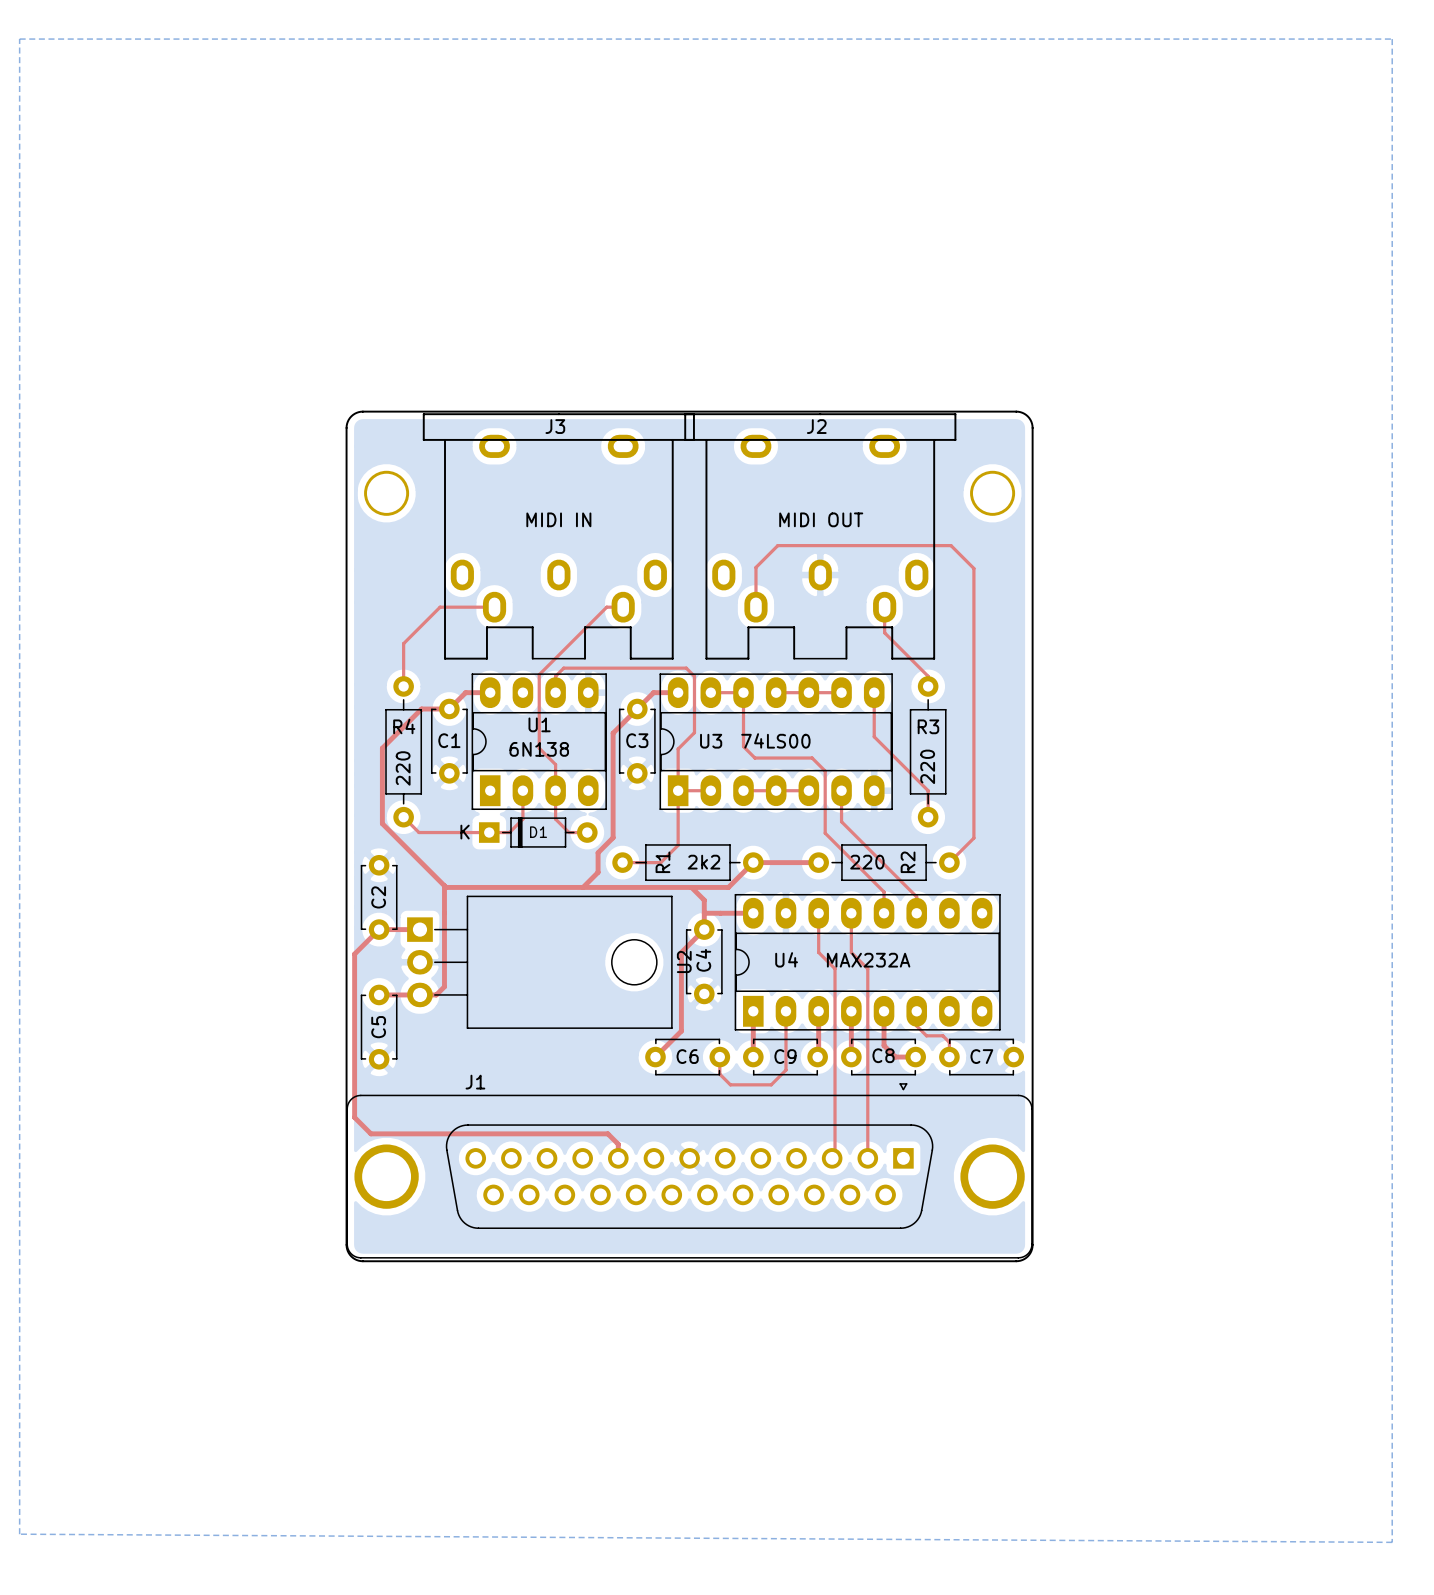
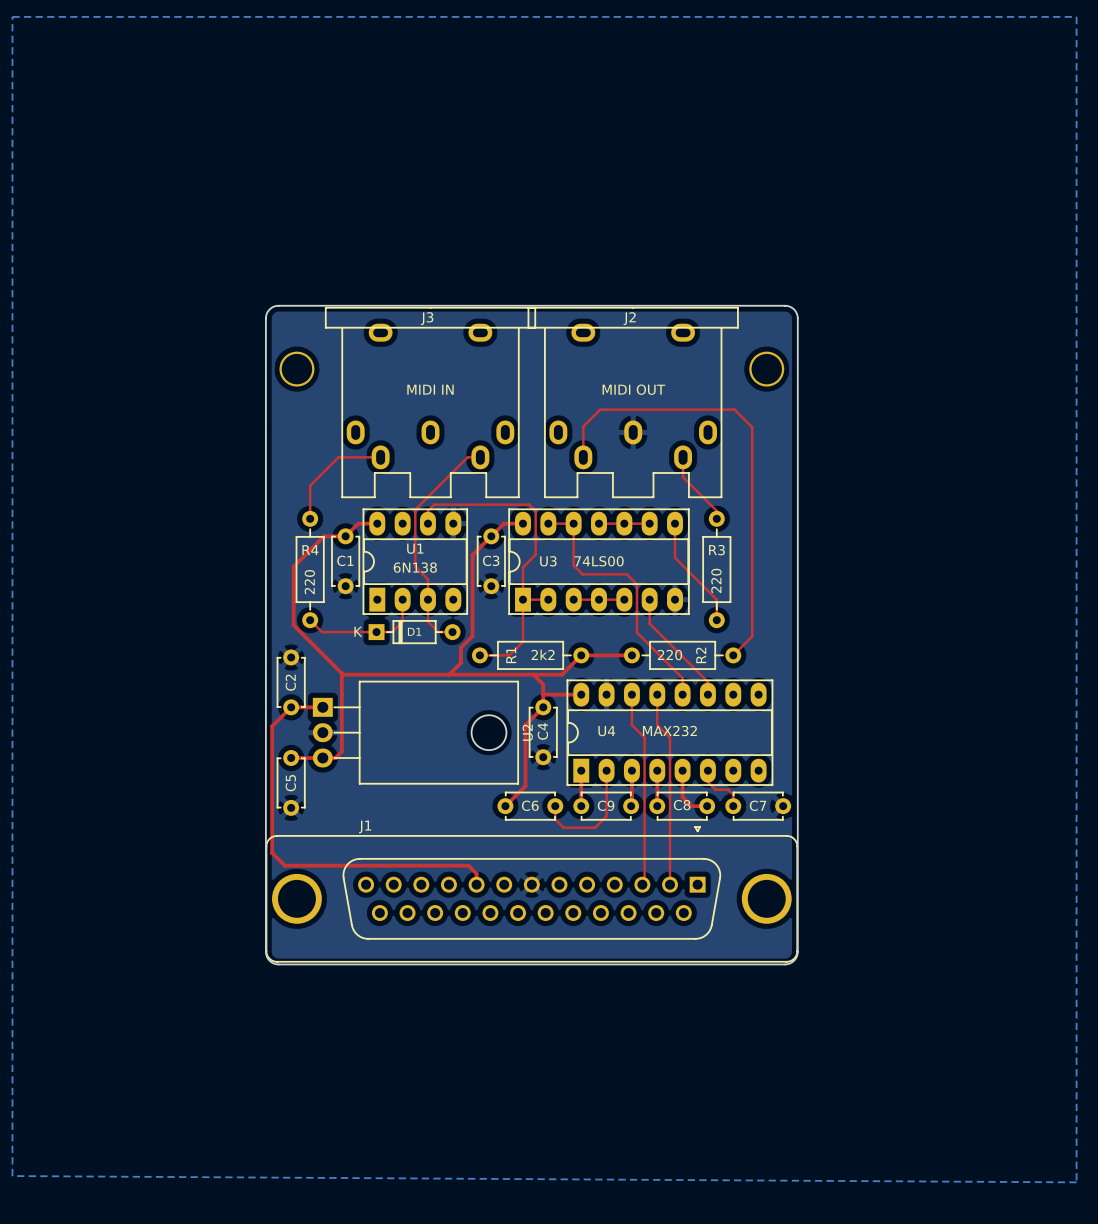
U4 value: MAX232A (868, 960) -> MAX232 (669, 731)

